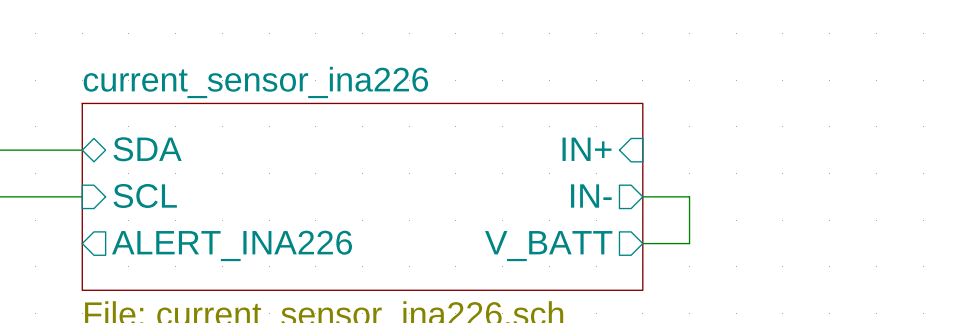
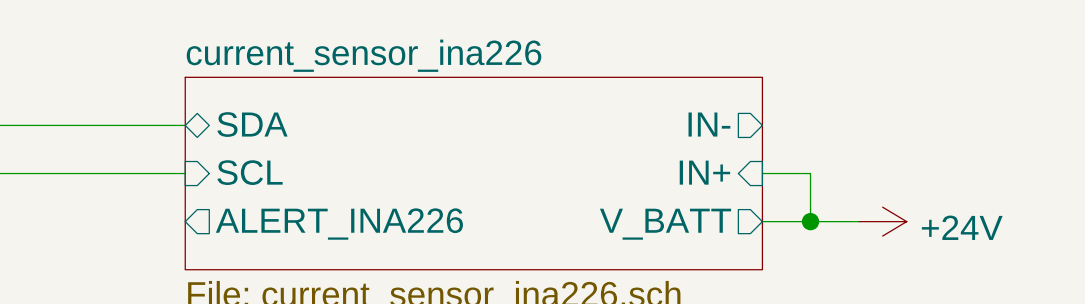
sheet pin shape: input (587, 149) -> output (709, 124)
sheet pin: IN+ (587, 149) -> IN- (709, 124)
sheet pin shape: output (591, 195) -> input (704, 172)
sheet pin: IN- (591, 195) -> IN+ (704, 172)
wire: none -> (810, 221) (858, 221)
junction: none -> (810, 221)
power symbol: none -> +24V (882, 221)

